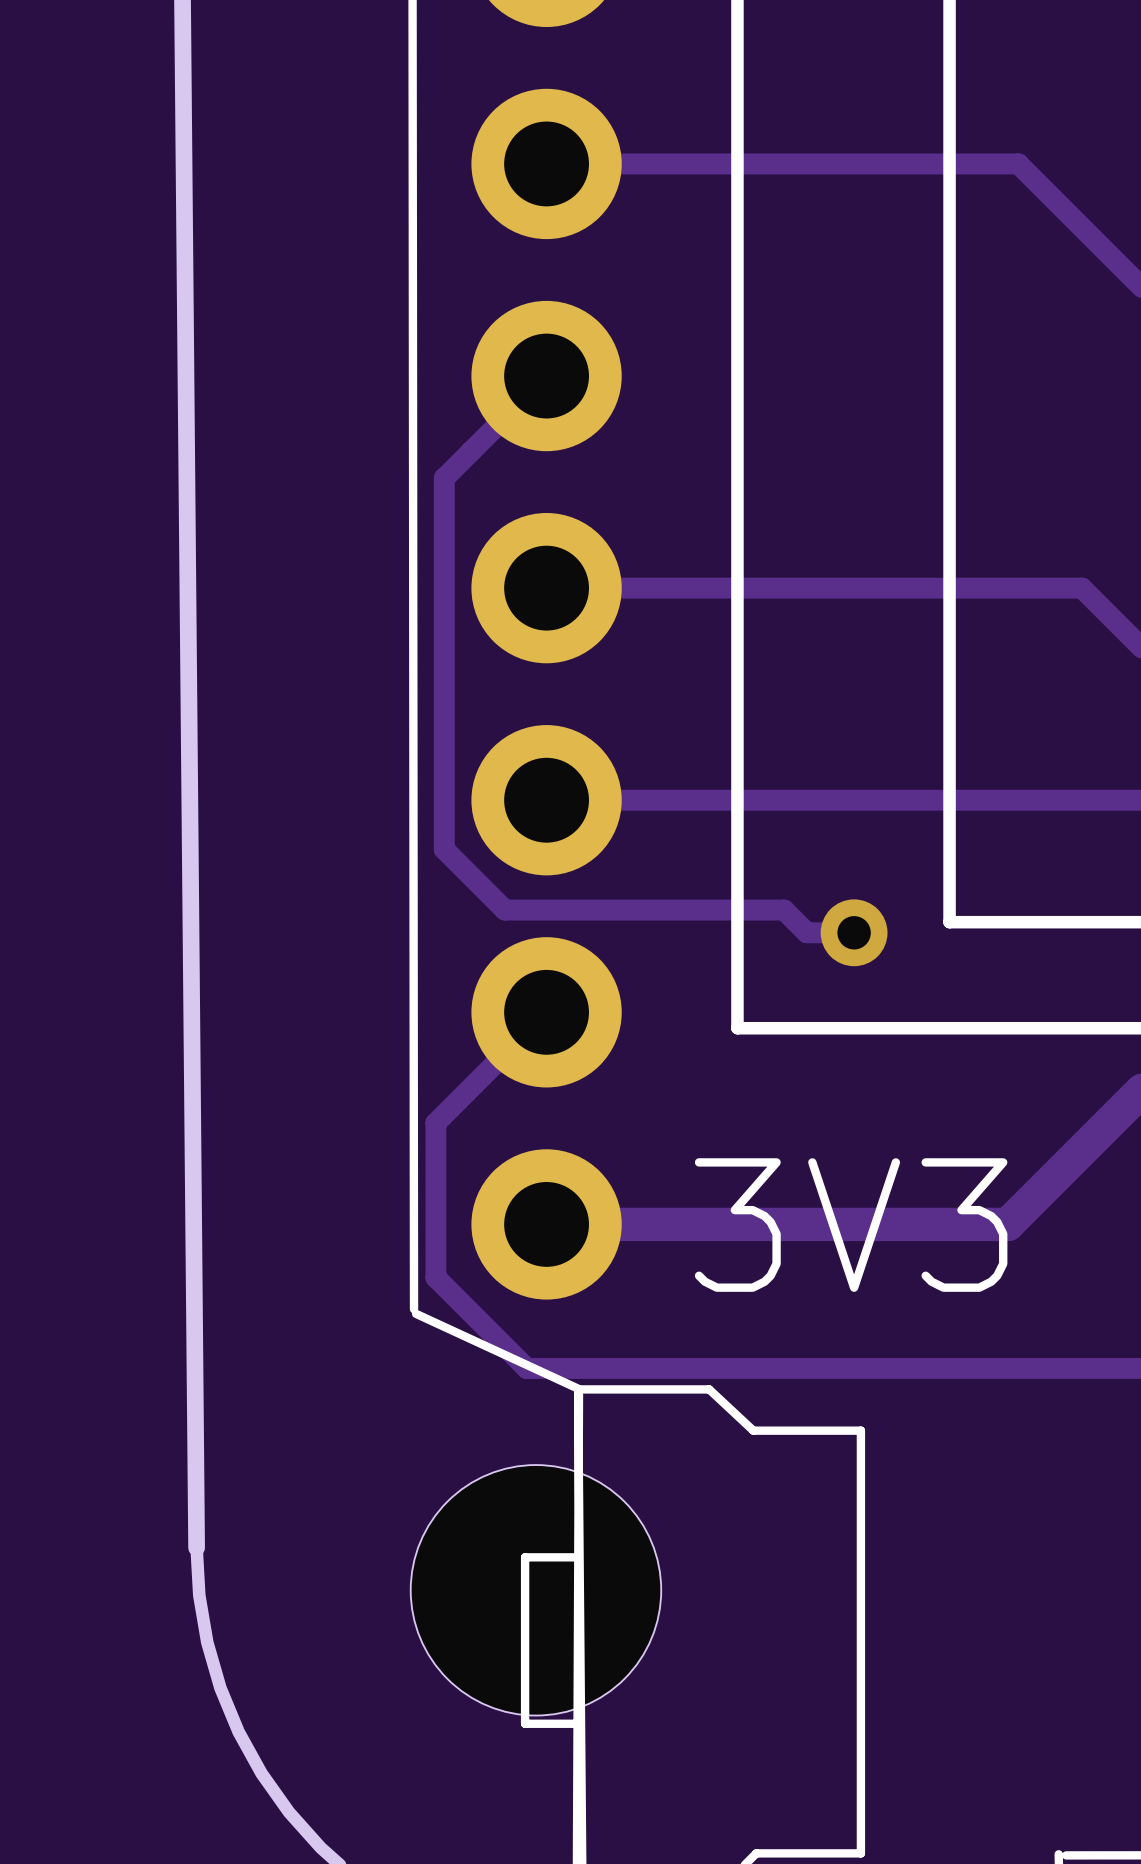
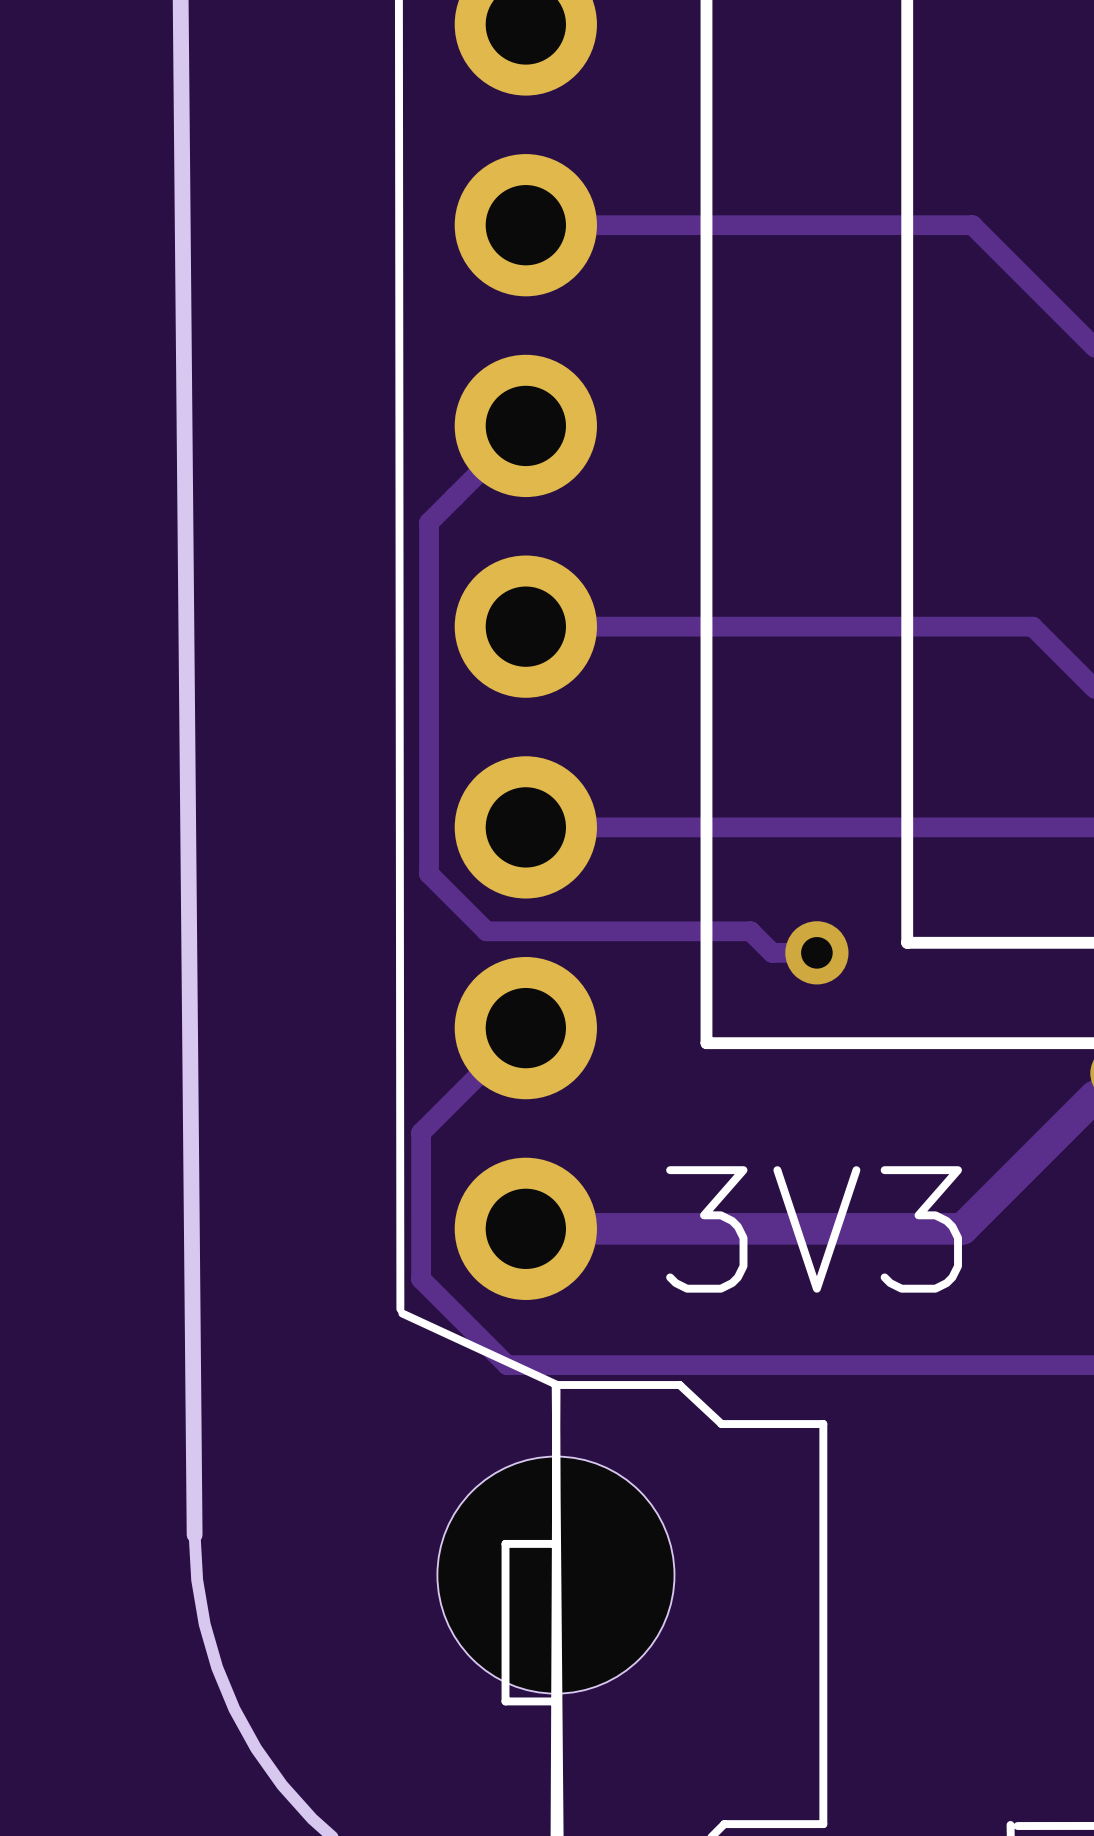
part position: (535, 1590) -> (555, 1575)

